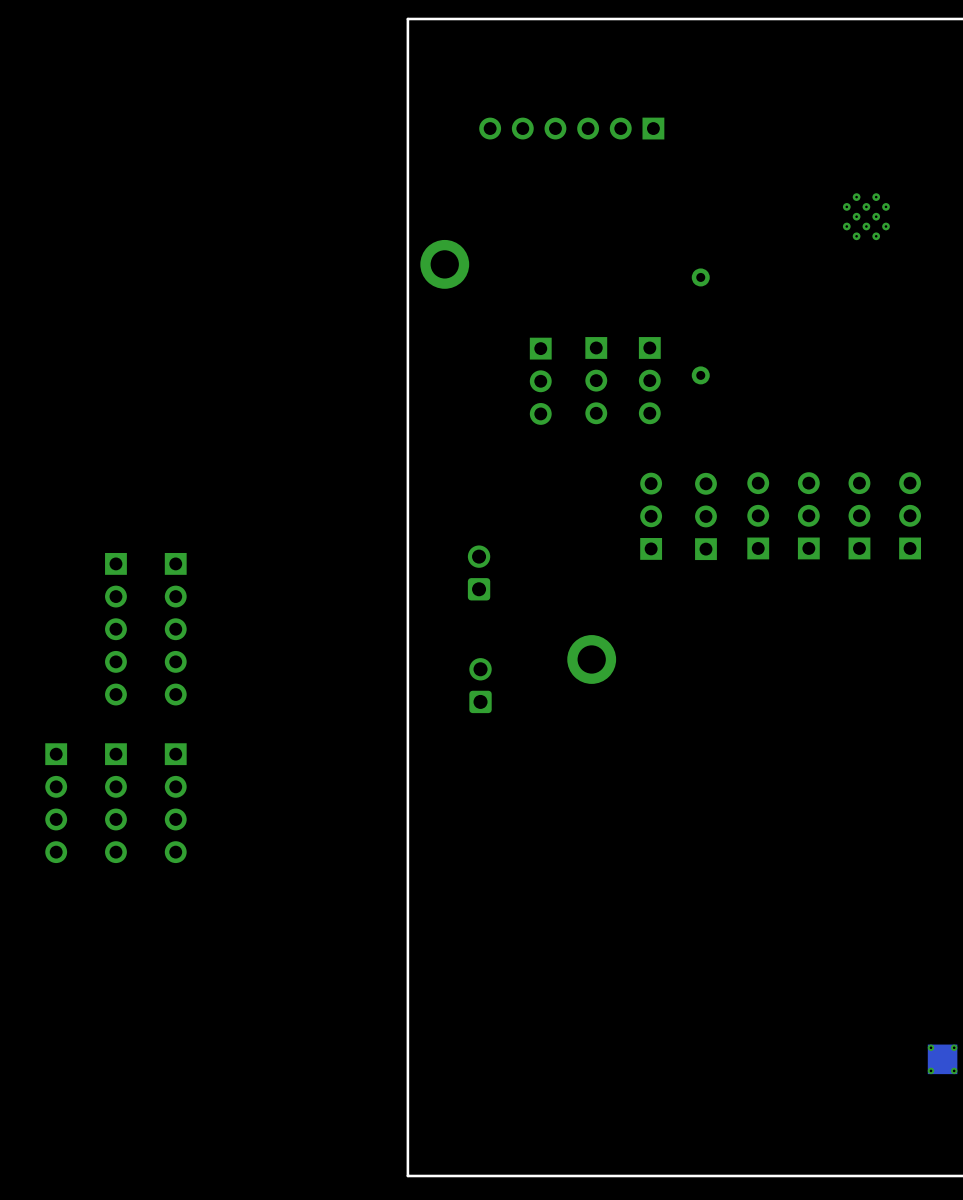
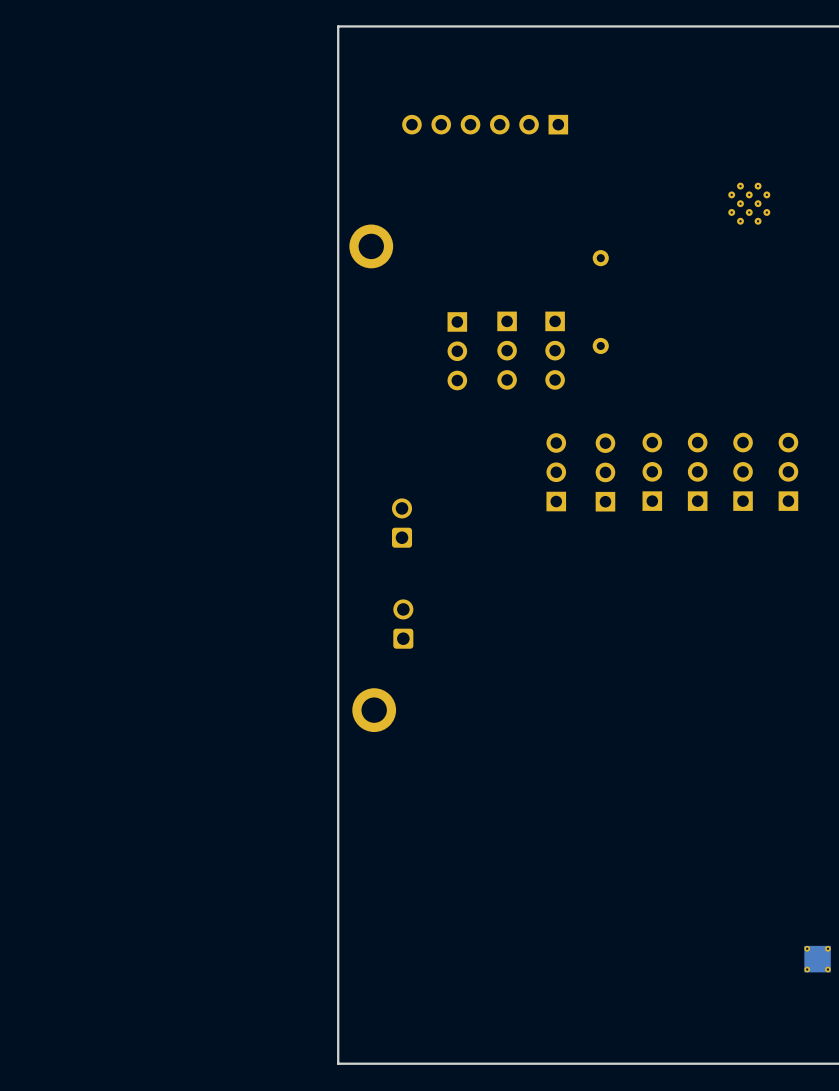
part: (115, 629) -> none
part: (175, 629) -> none
part position: (591, 659) -> (374, 710)
part: (56, 803) -> none
part: (115, 803) -> none
part: (175, 803) -> none

